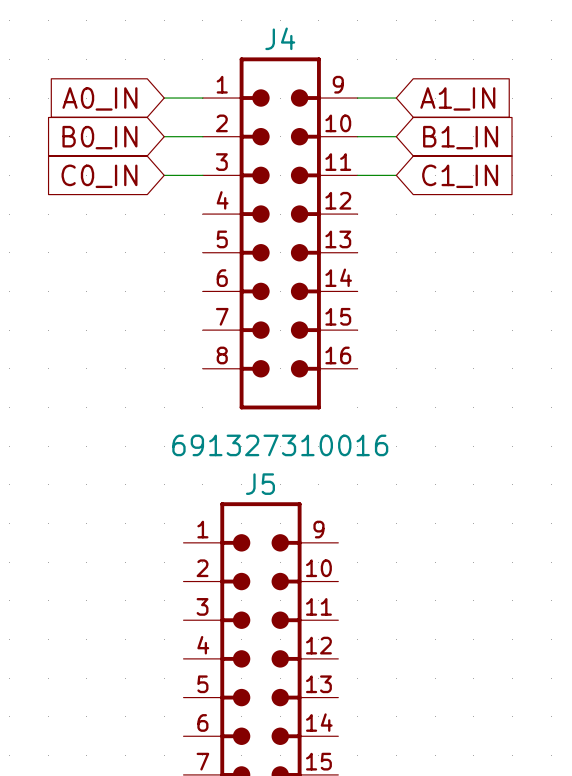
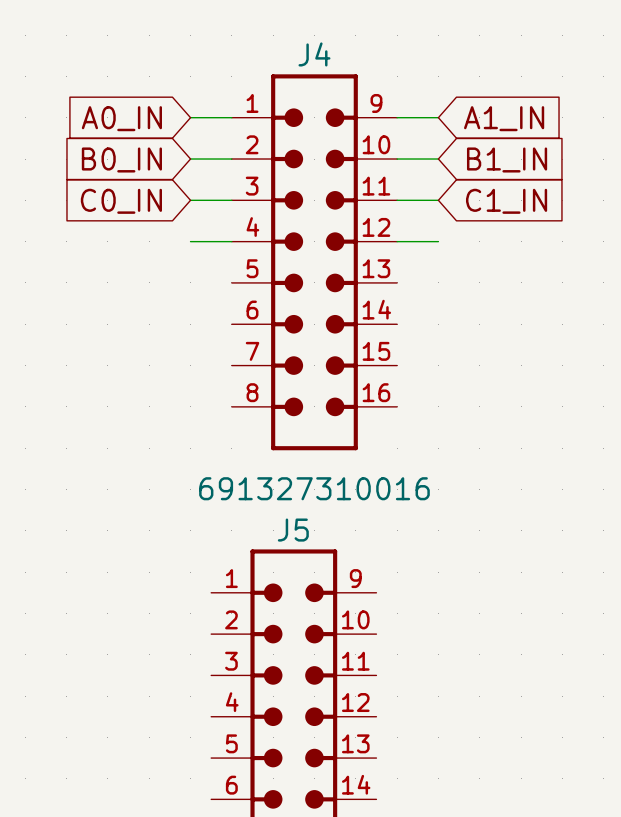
wire: none -> (190, 241) (231, 241)
wire: none -> (397, 241) (438, 241)

